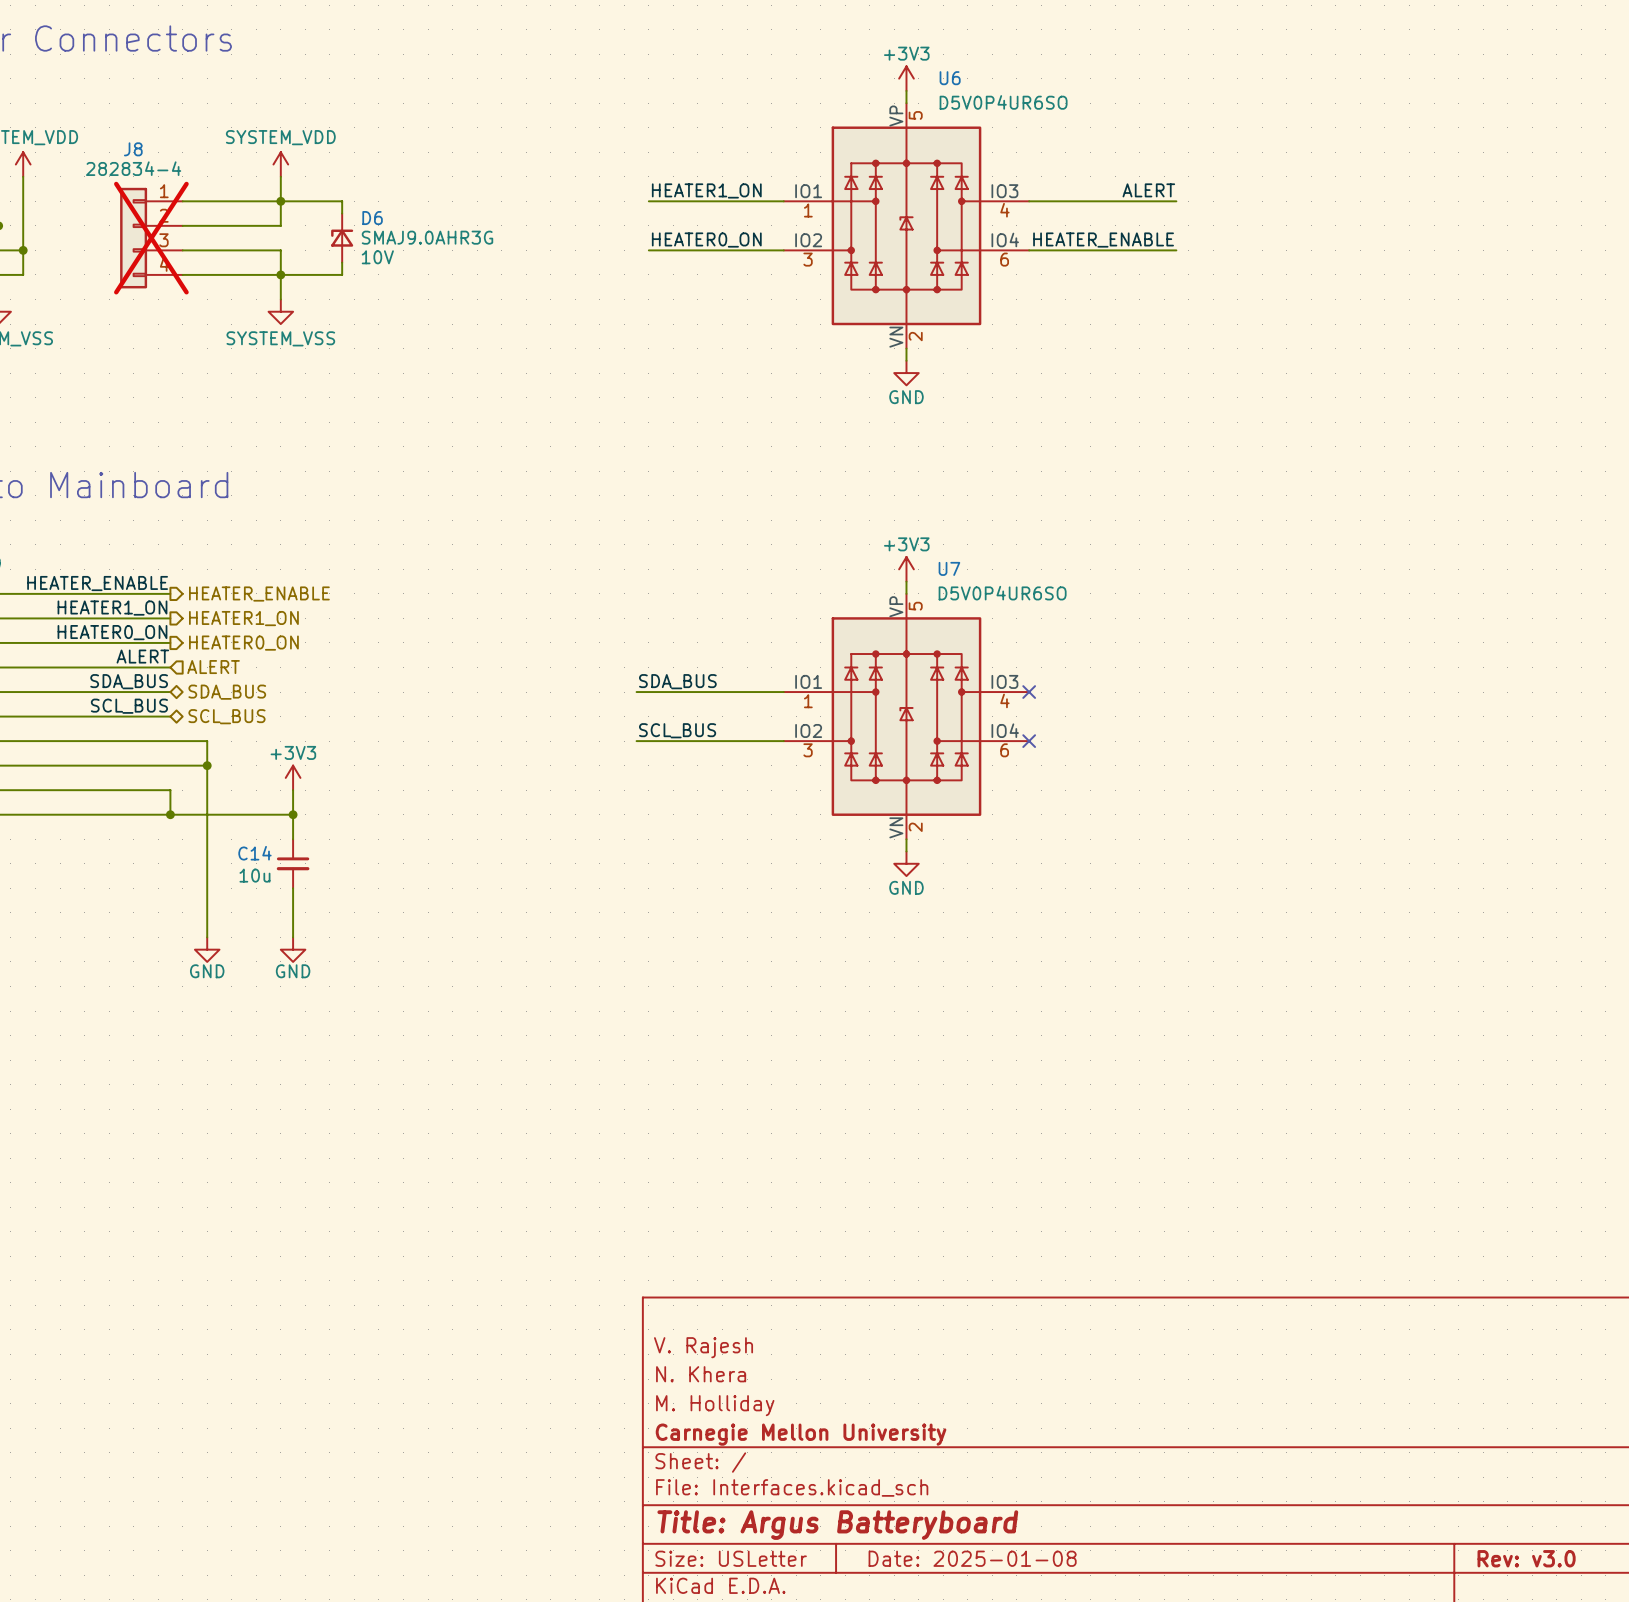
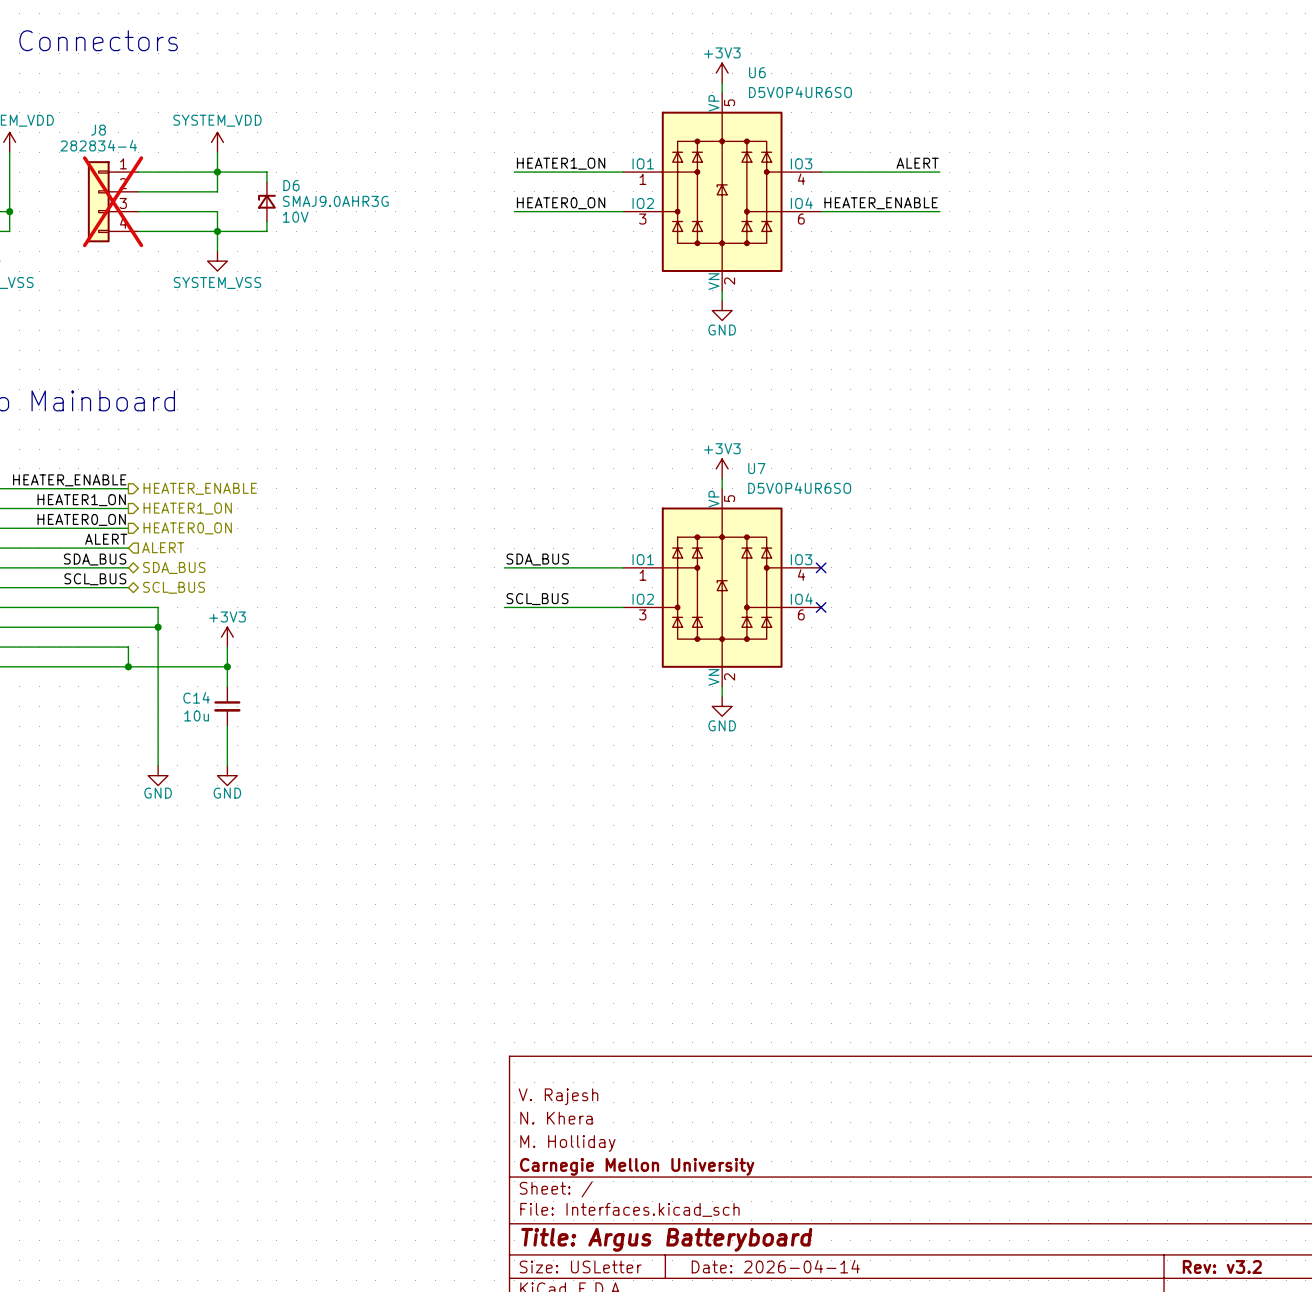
title block: Date: 2025-01-08 (972, 1558) -> Date: 2026-04-14 (775, 1266)
title block: Rev: v3.0 (1526, 1558) -> Rev: v3.2 (1222, 1266)

